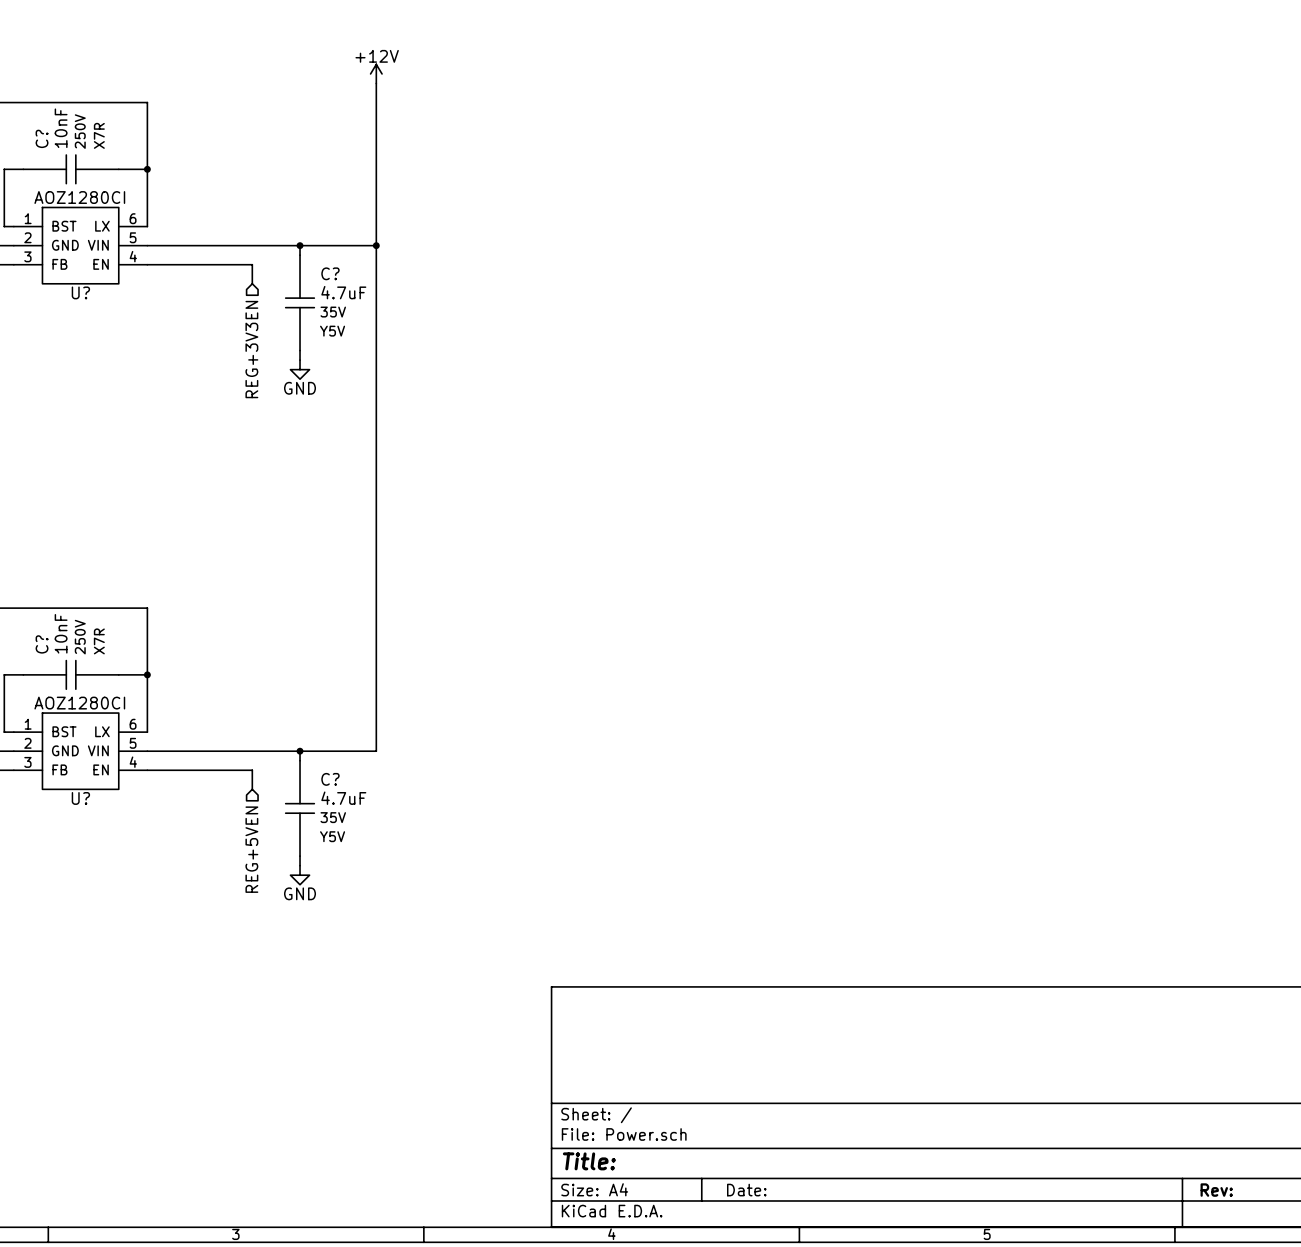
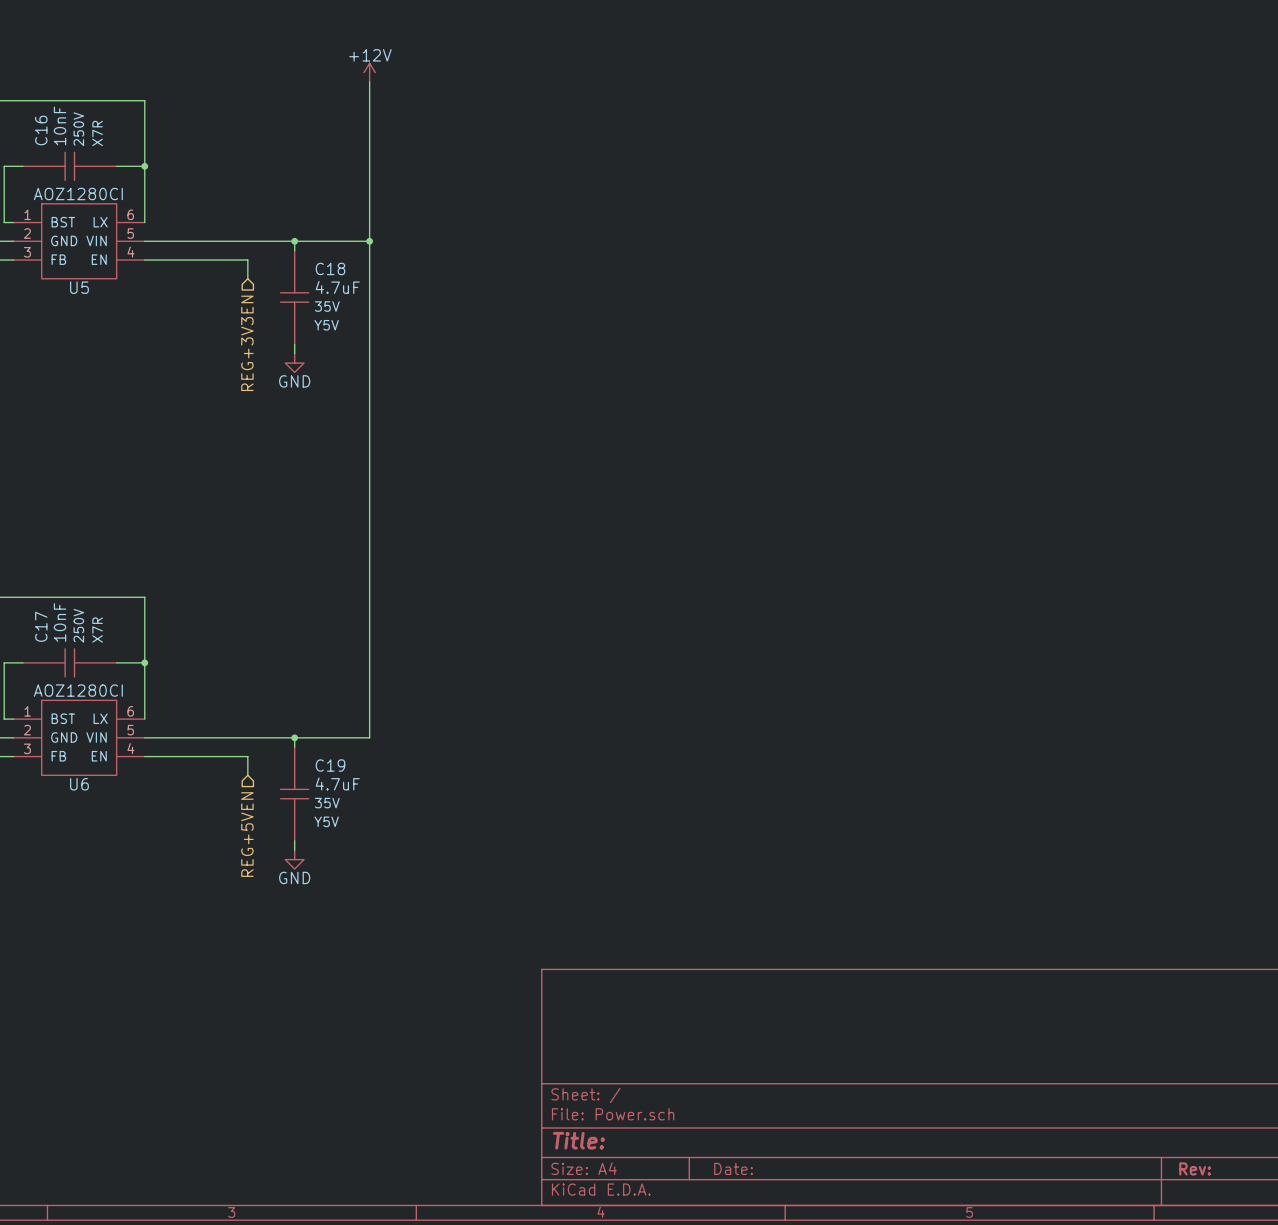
C? name: C? (42, 138) -> C16 (41, 130)
C? name: C? (330, 273) -> C18 (330, 268)
U? name: U? (80, 292) -> U5 (79, 287)
C? name: C? (42, 644) -> C17 (41, 626)
C? name: C? (330, 779) -> C19 (330, 765)
U? name: U? (80, 798) -> U6 (79, 784)

